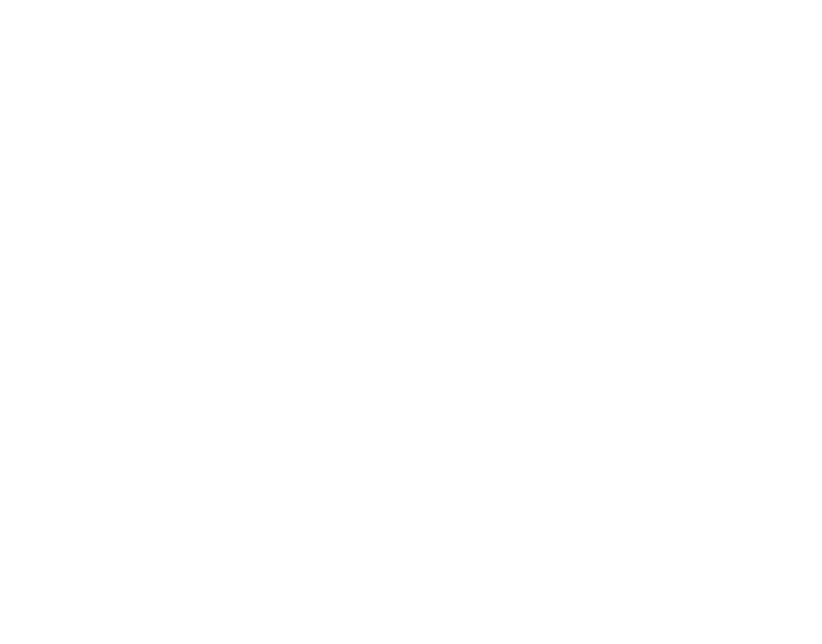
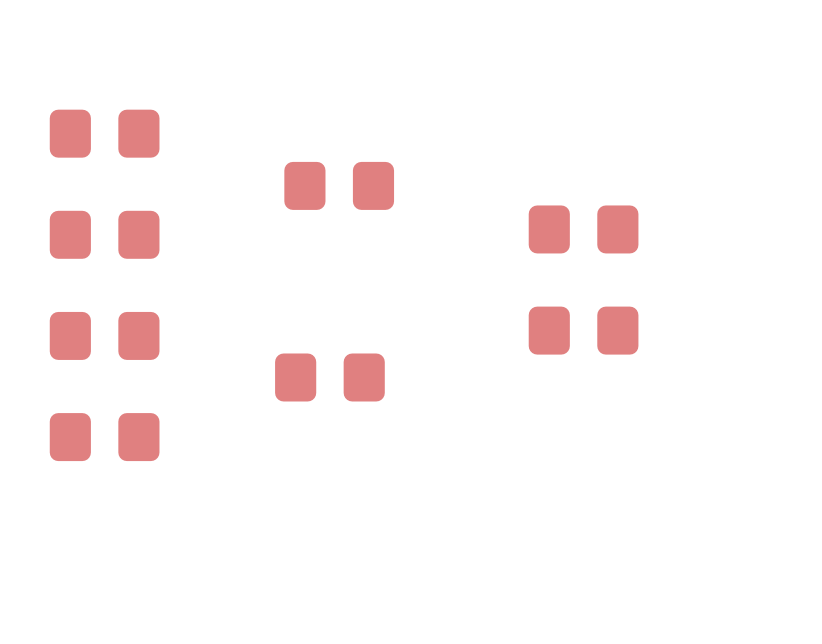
part: none -> (104, 133)
part: none -> (339, 185)
part: none -> (583, 229)
part: none -> (104, 234)
part: none -> (583, 330)
part: none -> (104, 335)
part: none -> (329, 377)
part: none -> (104, 437)

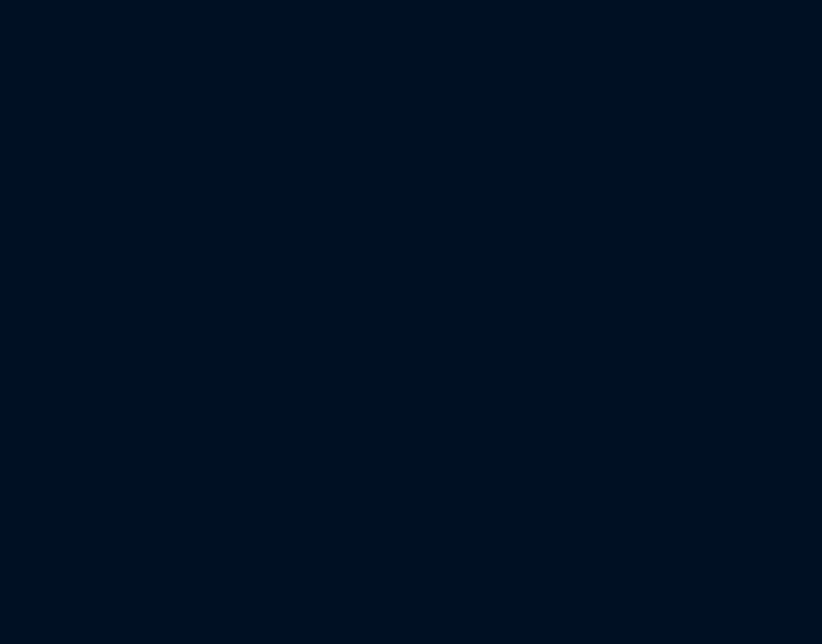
part: (104, 133) -> none
part: (339, 185) -> none
part: (583, 229) -> none
part: (104, 234) -> none
part: (583, 330) -> none
part: (104, 335) -> none
part: (329, 377) -> none
part: (104, 437) -> none

